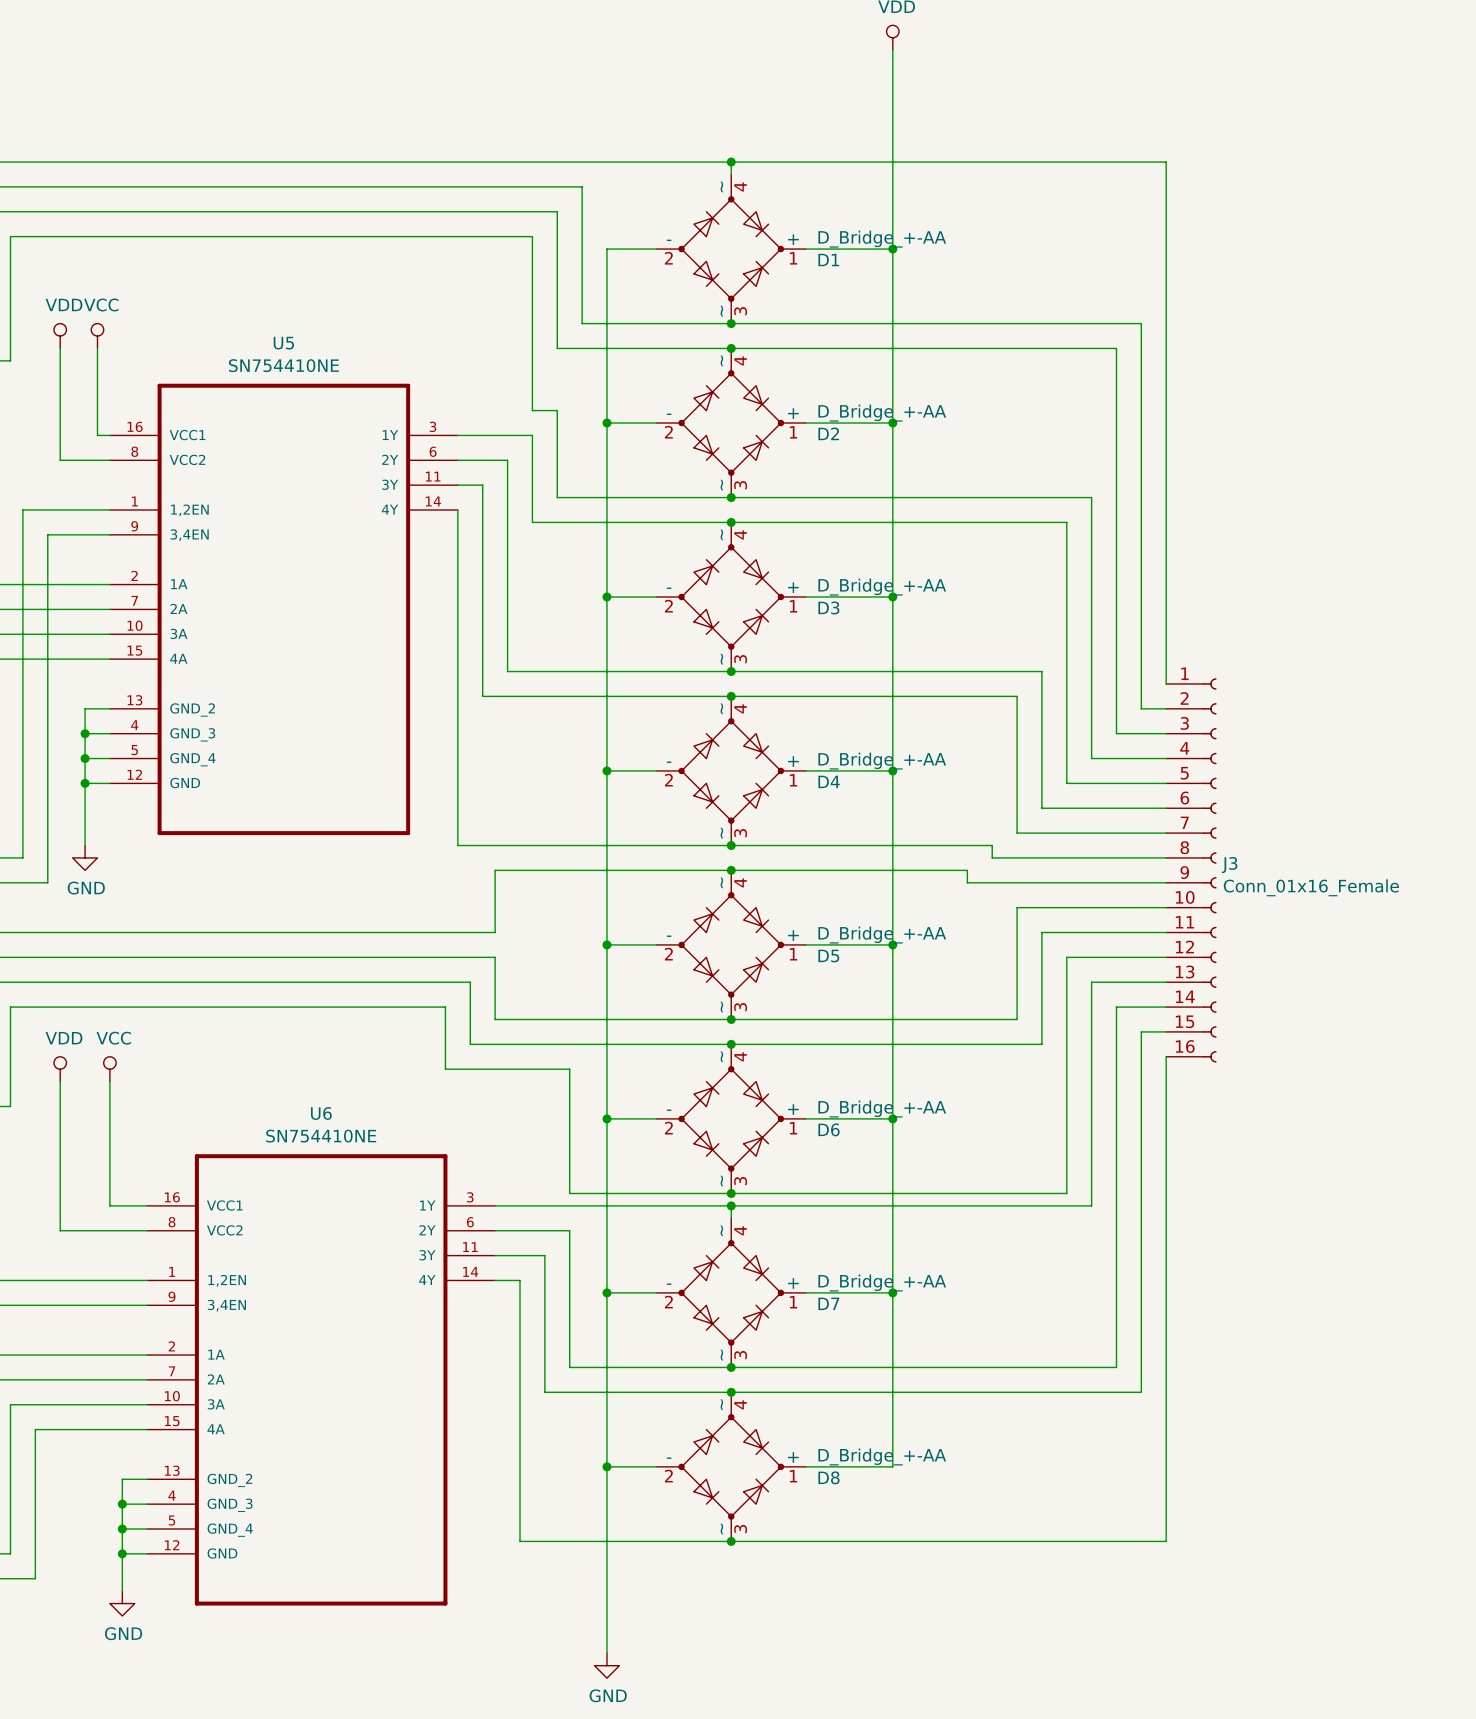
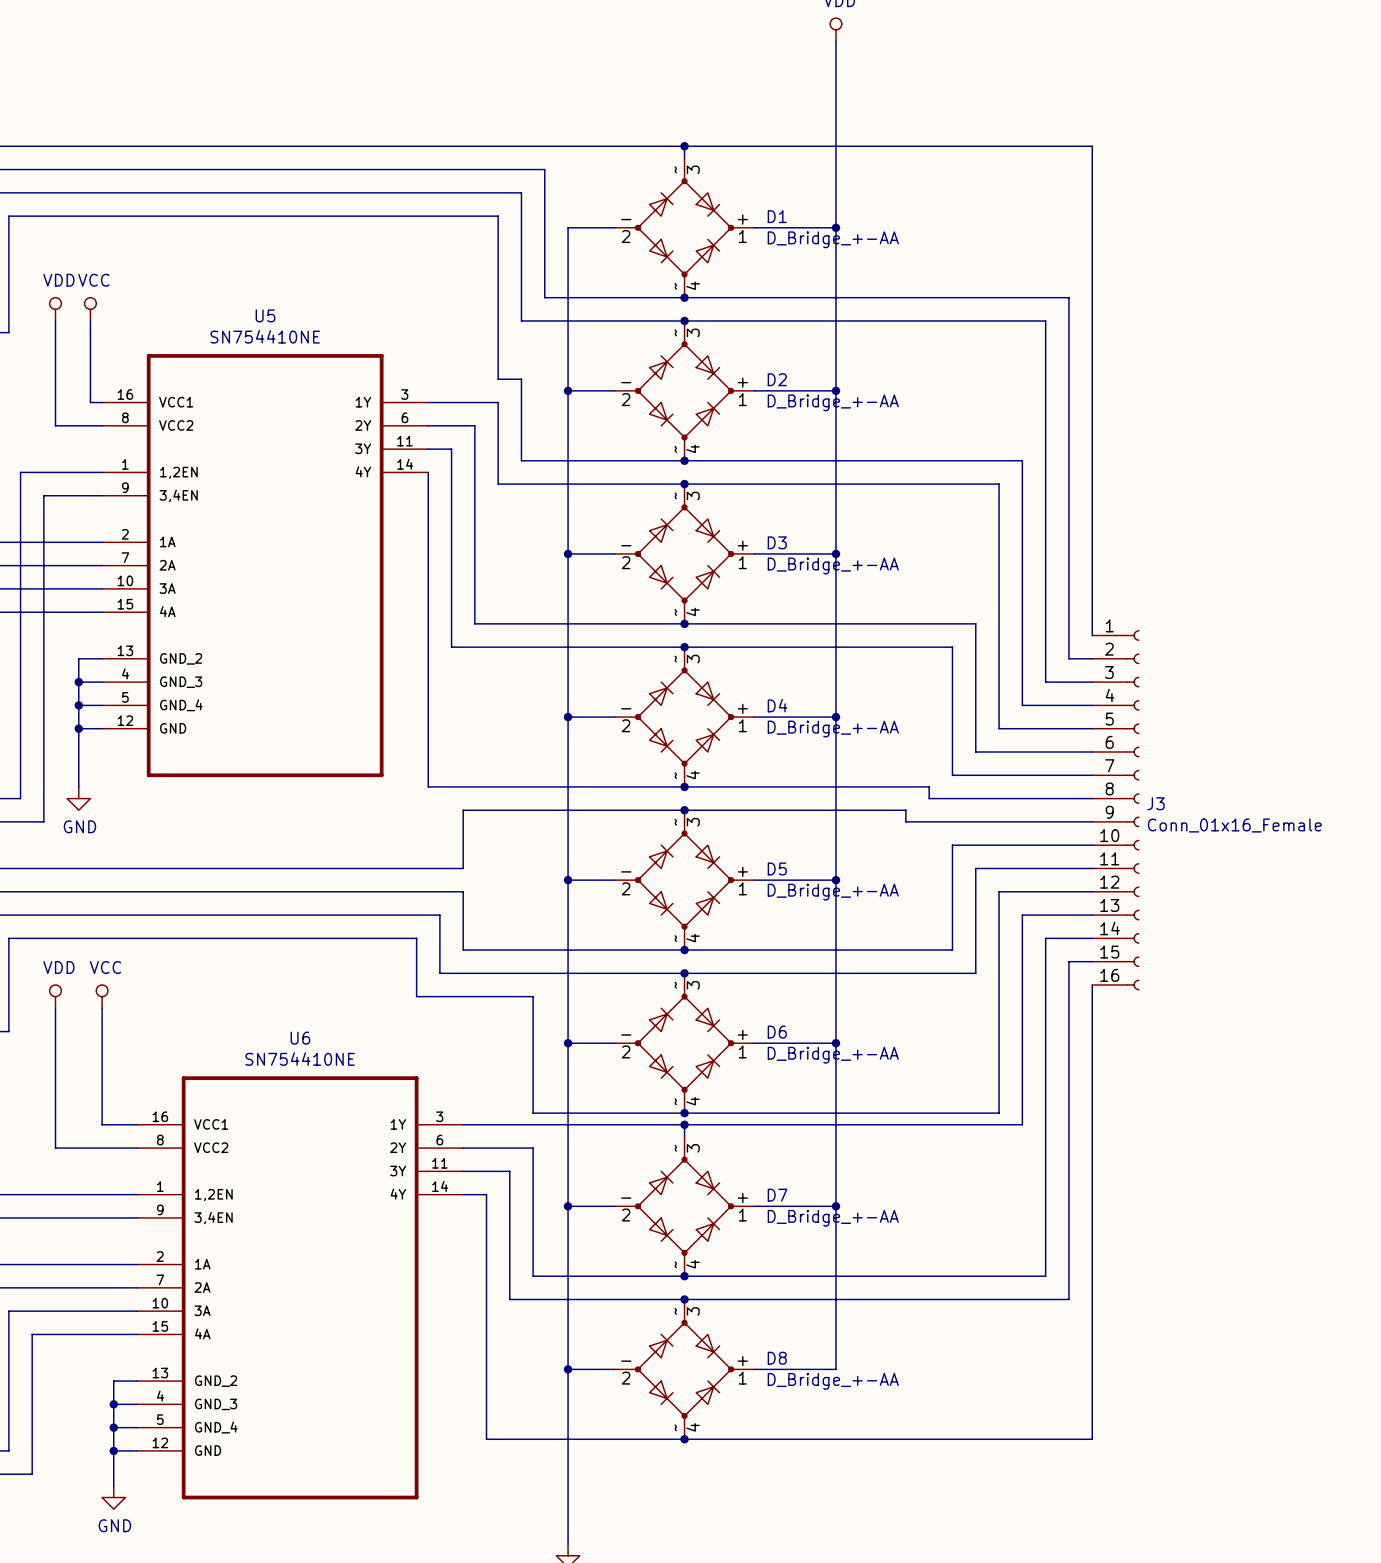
D1 flip: as is (731, 249) -> up-down (684, 227)
D2 flip: as is (731, 423) -> up-down (684, 390)
D3 flip: as is (731, 596) -> up-down (684, 553)
D4 flip: as is (731, 770) -> up-down (684, 717)
D5 flip: as is (731, 944) -> up-down (684, 880)
D6 flip: as is (731, 1118) -> up-down (684, 1043)
D7 flip: as is (731, 1292) -> up-down (684, 1206)
D8 flip: as is (731, 1466) -> up-down (684, 1369)

